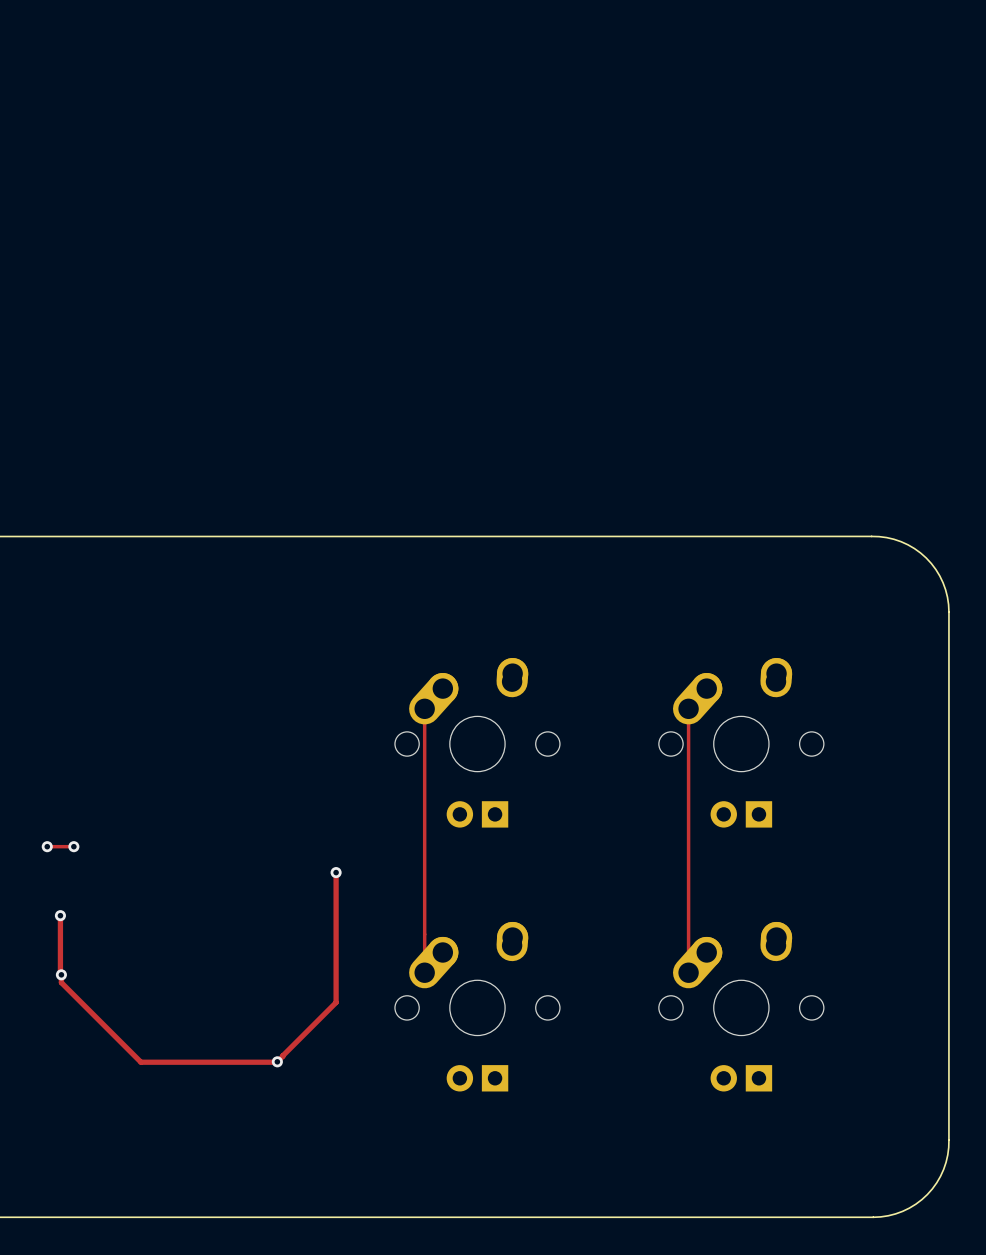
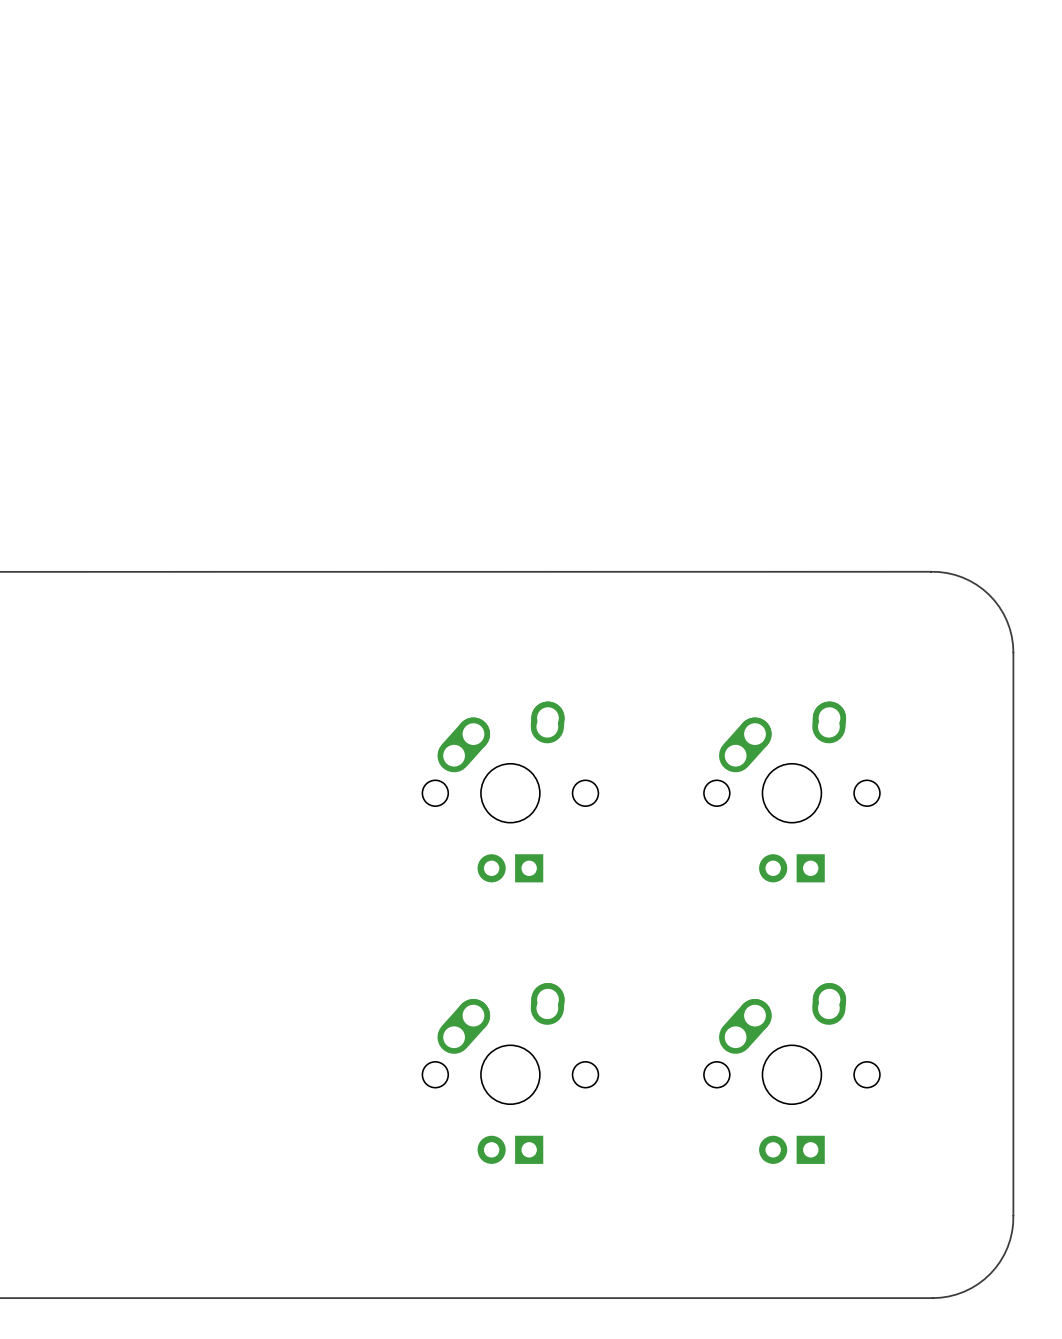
track: (424, 708) (424, 972) -> none
track: (688, 708) (688, 972) -> none
track: (47, 846) (73, 846) -> none
via: (47, 846) -> none
via: (73, 846) -> none
track: (336, 872) (336, 1002) (276, 1062) (140, 1062) (61, 982) (60, 915) -> none
via: (336, 872) -> none
via: (60, 915) -> none
via: (61, 974) -> none
via: (277, 1061) -> none

